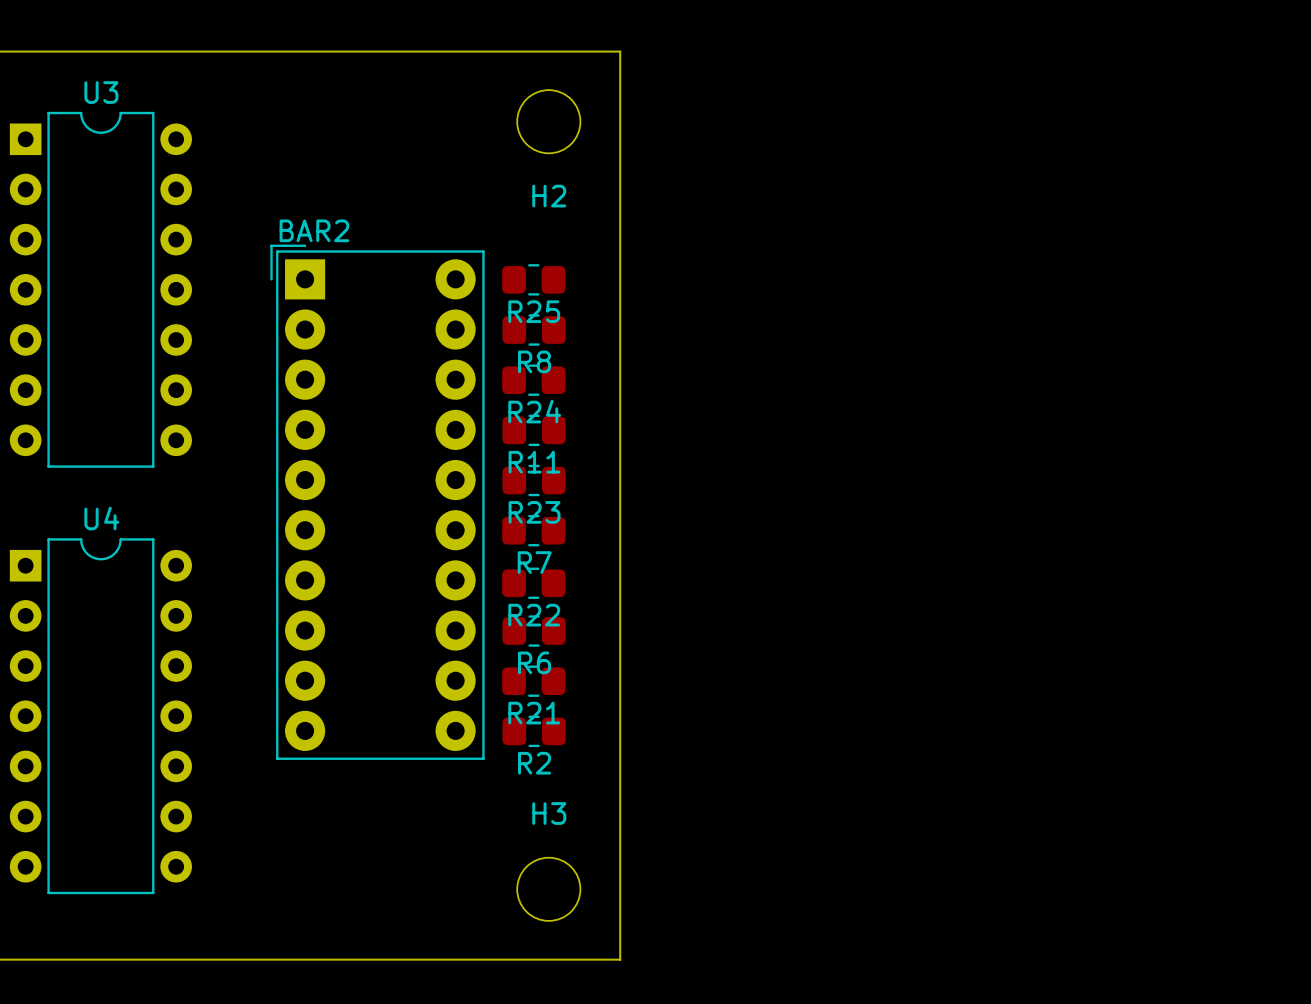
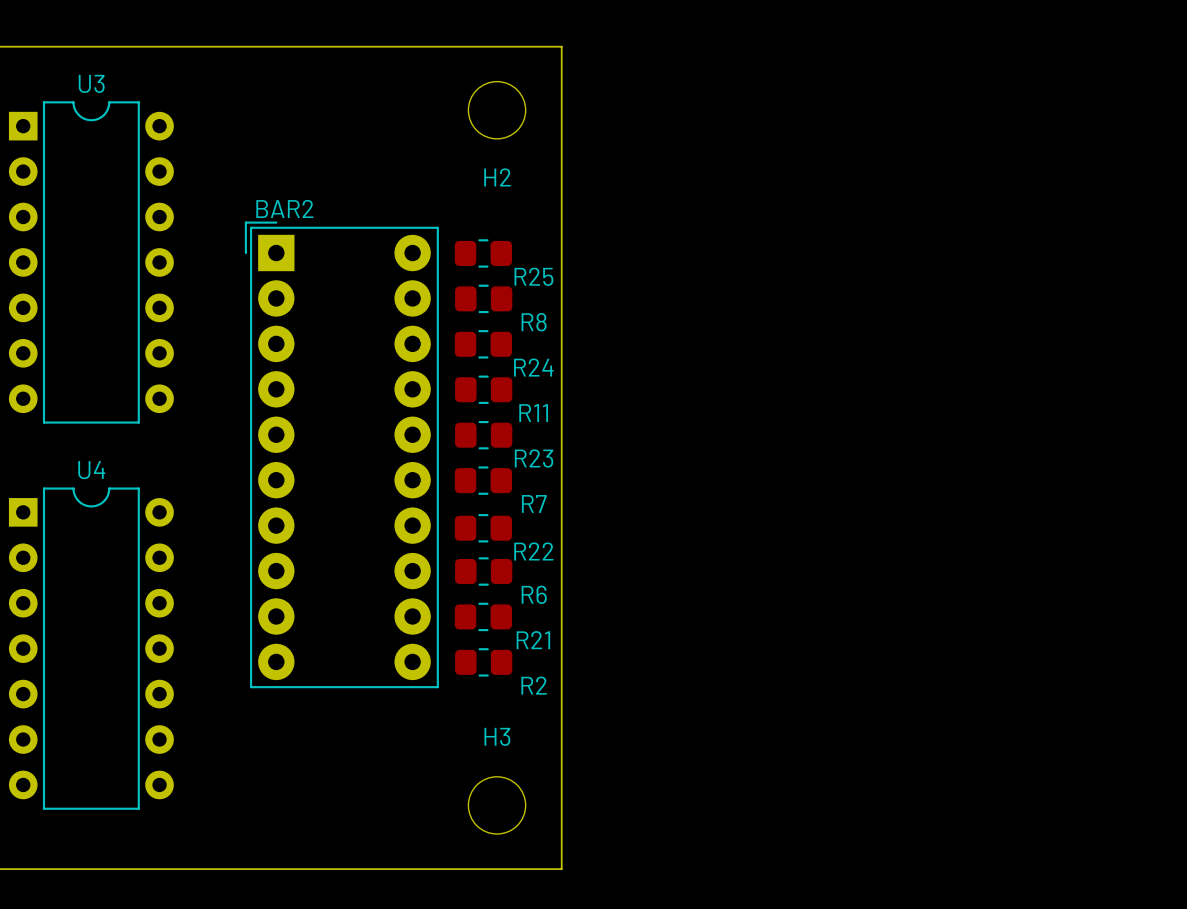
R25 name position: R25 (534, 311) -> R25 (533, 276)
R8 name position: R8 (534, 361) -> R8 (534, 322)
R24 name position: R24 (534, 411) -> R24 (533, 367)
R11 name position: R11 (534, 462) -> R11 (533, 413)
R23 name position: R23 (534, 512) -> R23 (534, 458)
R7 name position: R7 (534, 562) -> R7 (534, 503)
R22 name position: R22 (534, 615) -> R22 (533, 551)
R6 name position: R6 (534, 662) -> R6 (534, 594)
R21 name position: R21 (534, 713) -> R21 (533, 640)
R2 name position: R2 (534, 763) -> R2 (534, 685)

